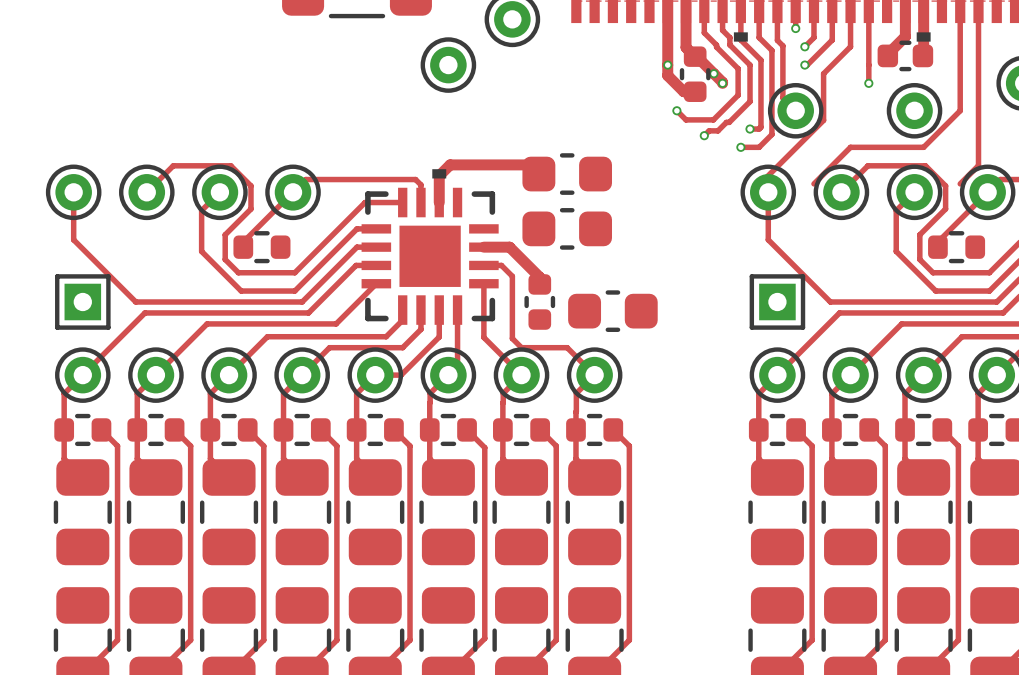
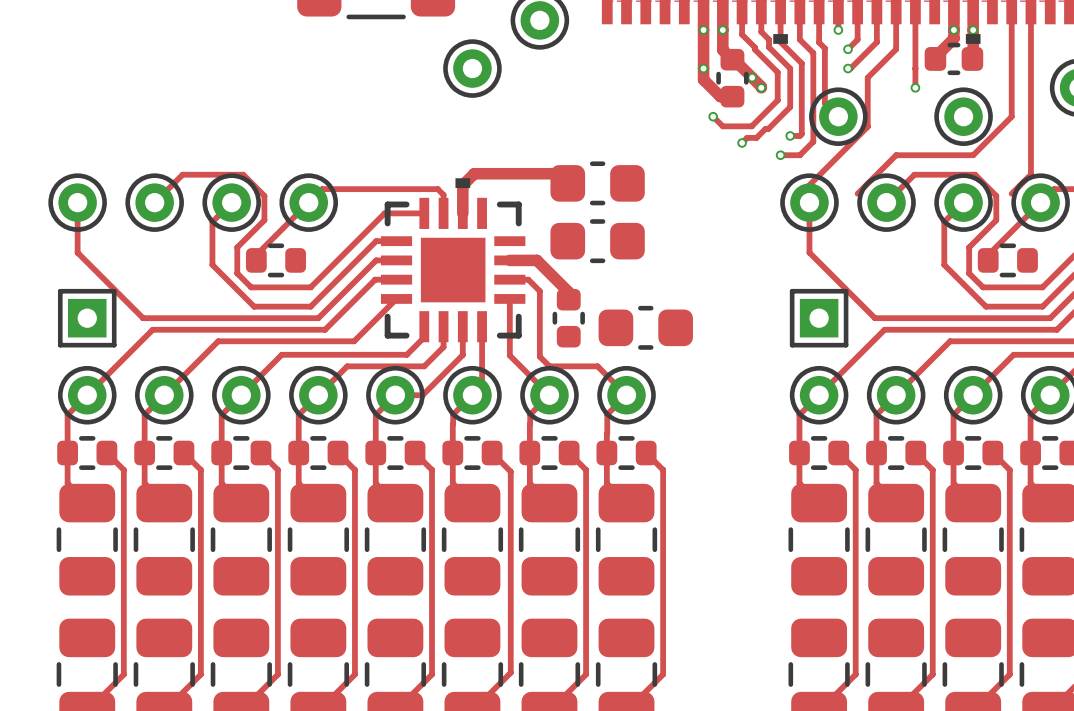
via: none -> (703, 30)
via: none -> (722, 30)
via: none -> (953, 30)
via: none -> (973, 30)

